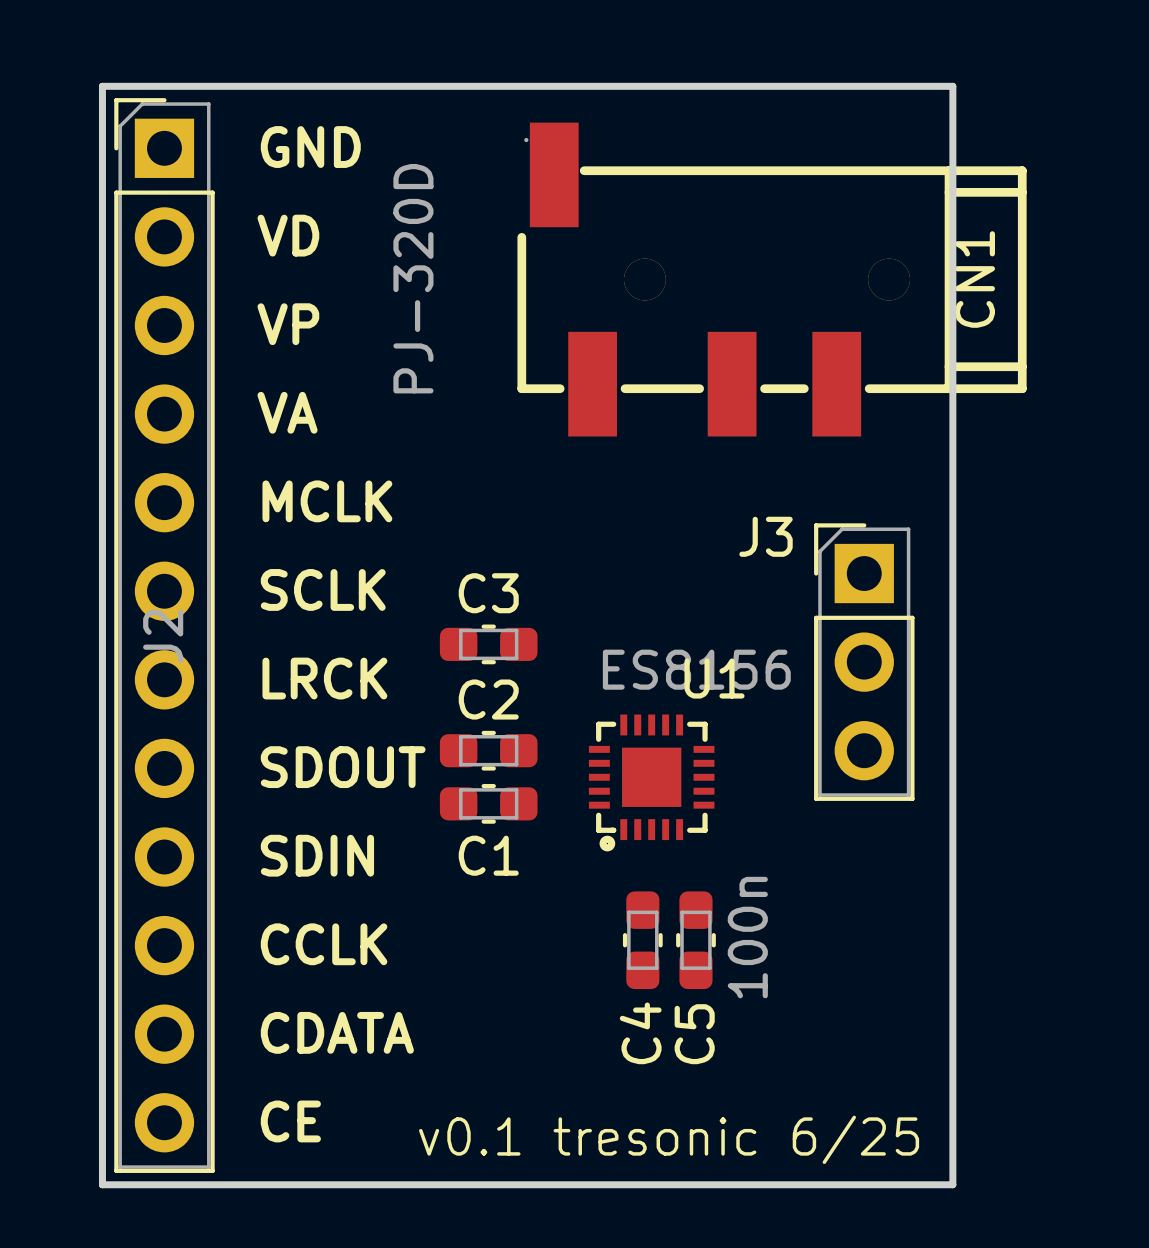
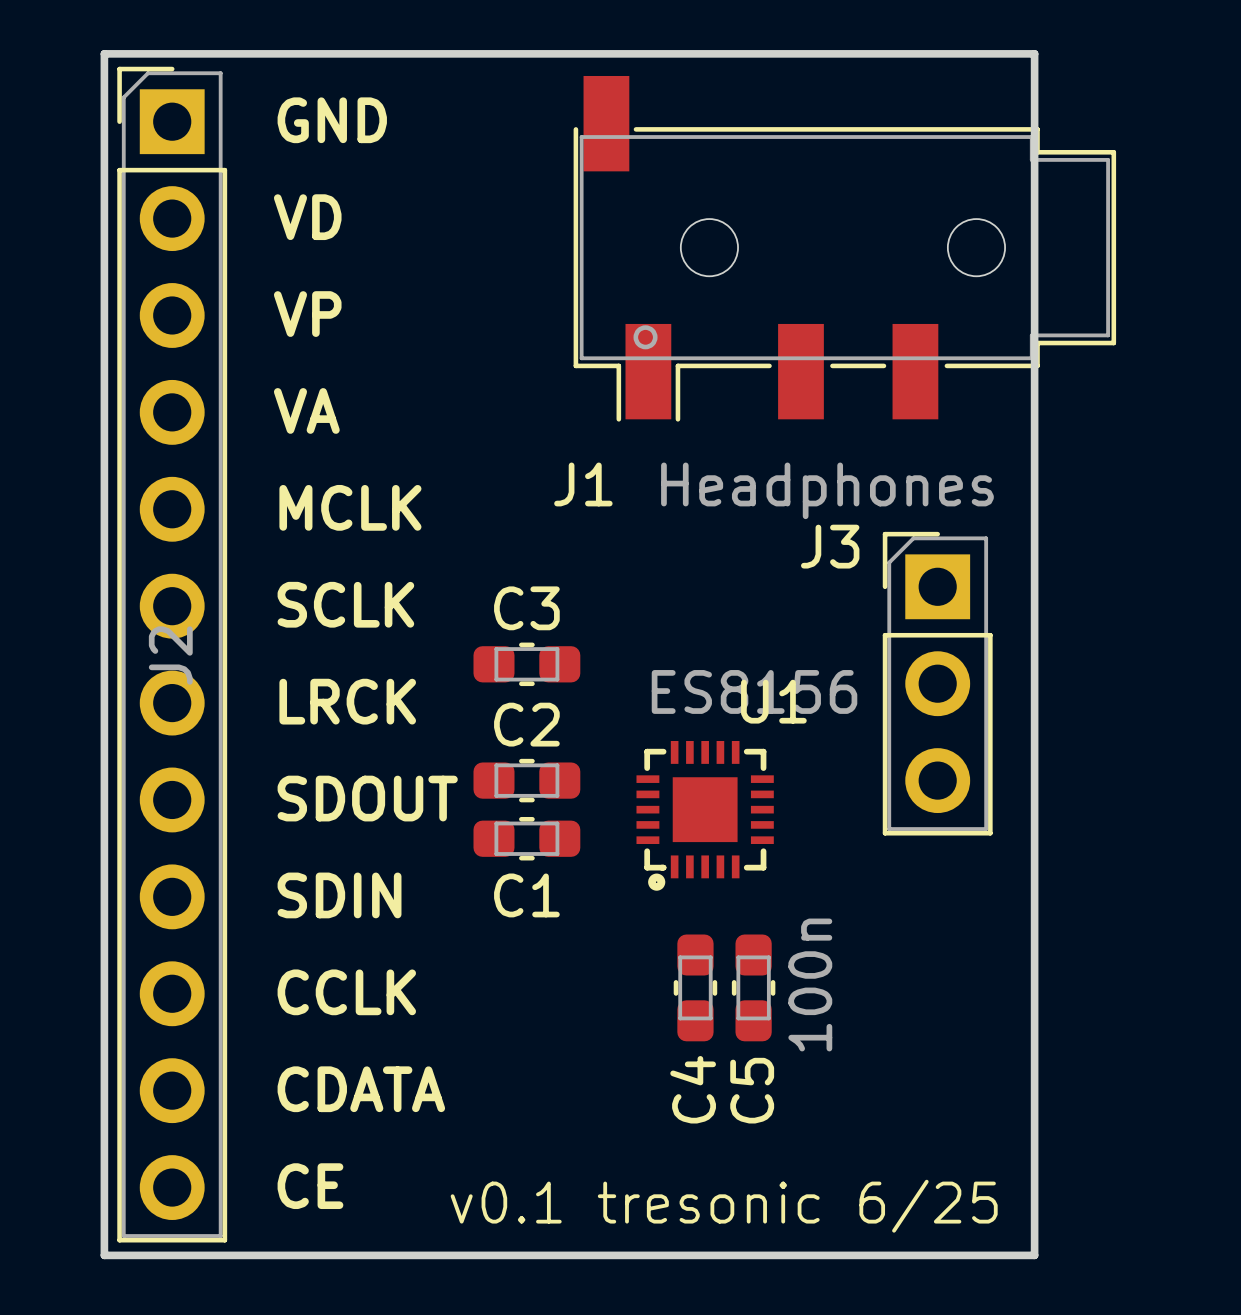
J1: none -> Headphones (844, 248)
CN1: PJ-320D (772, 279) -> none

